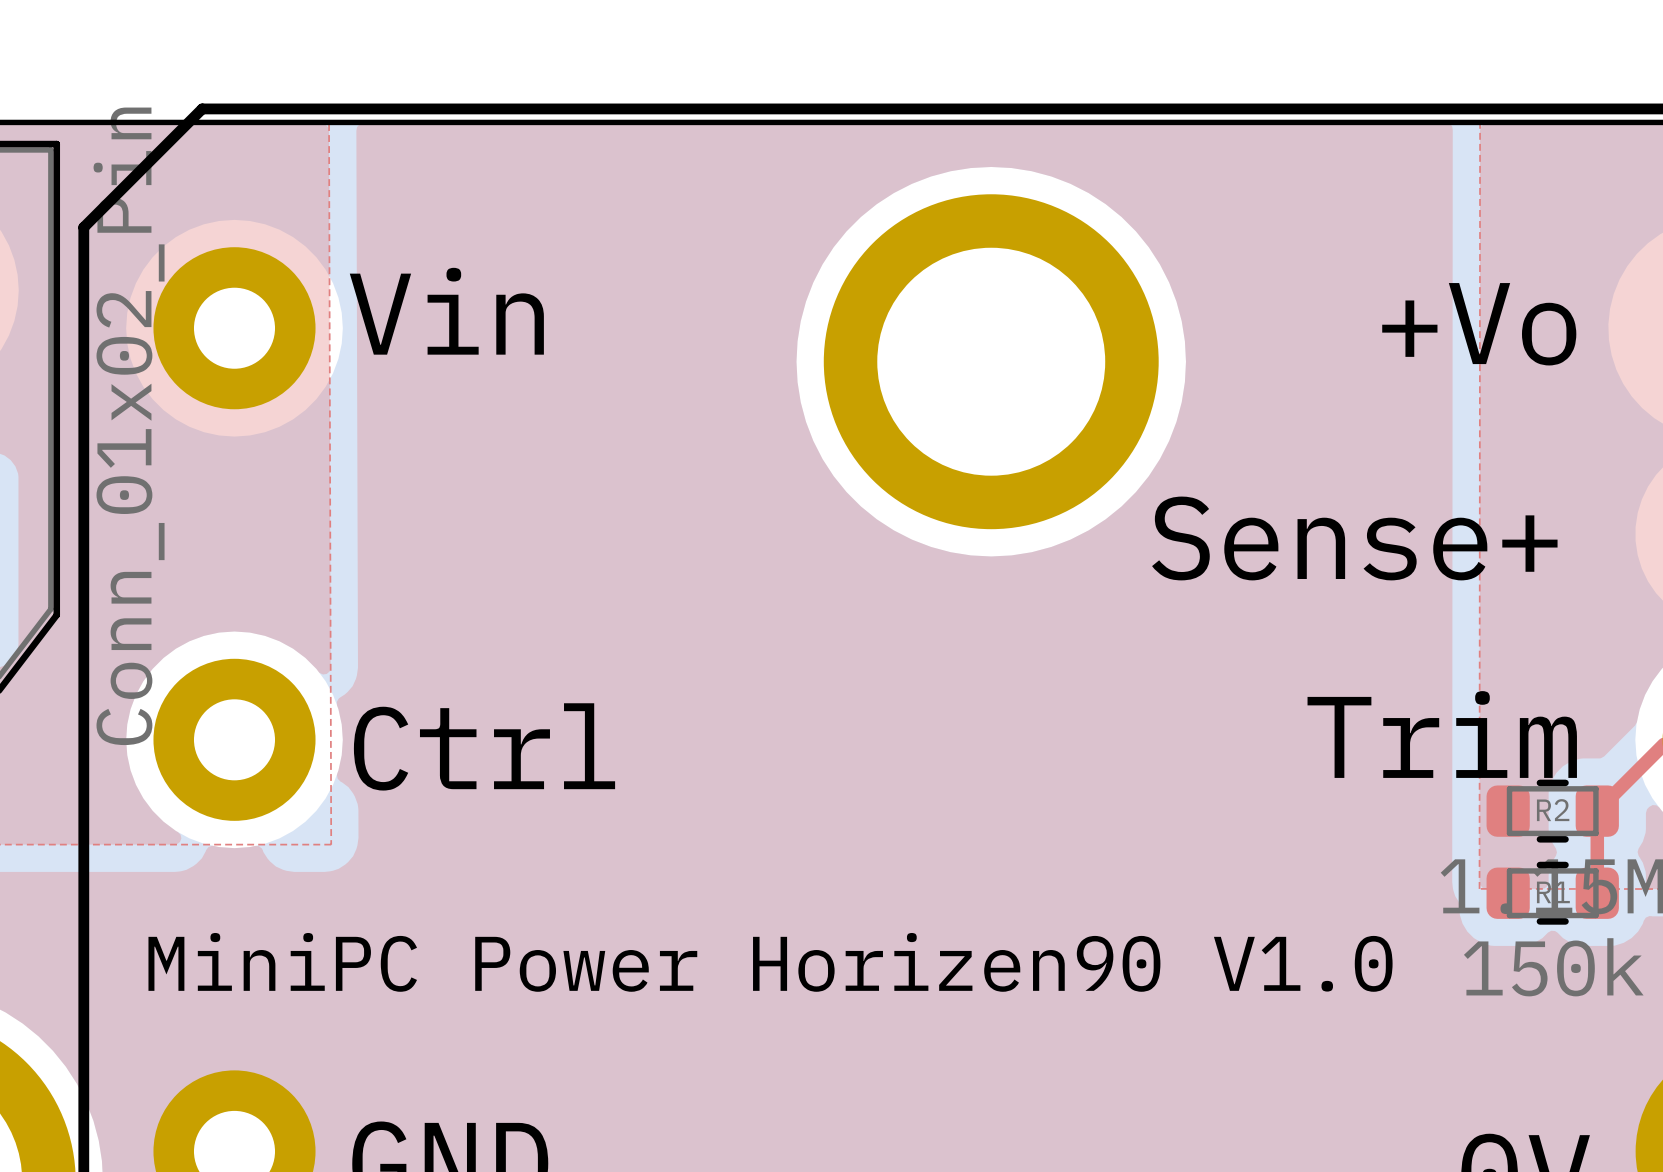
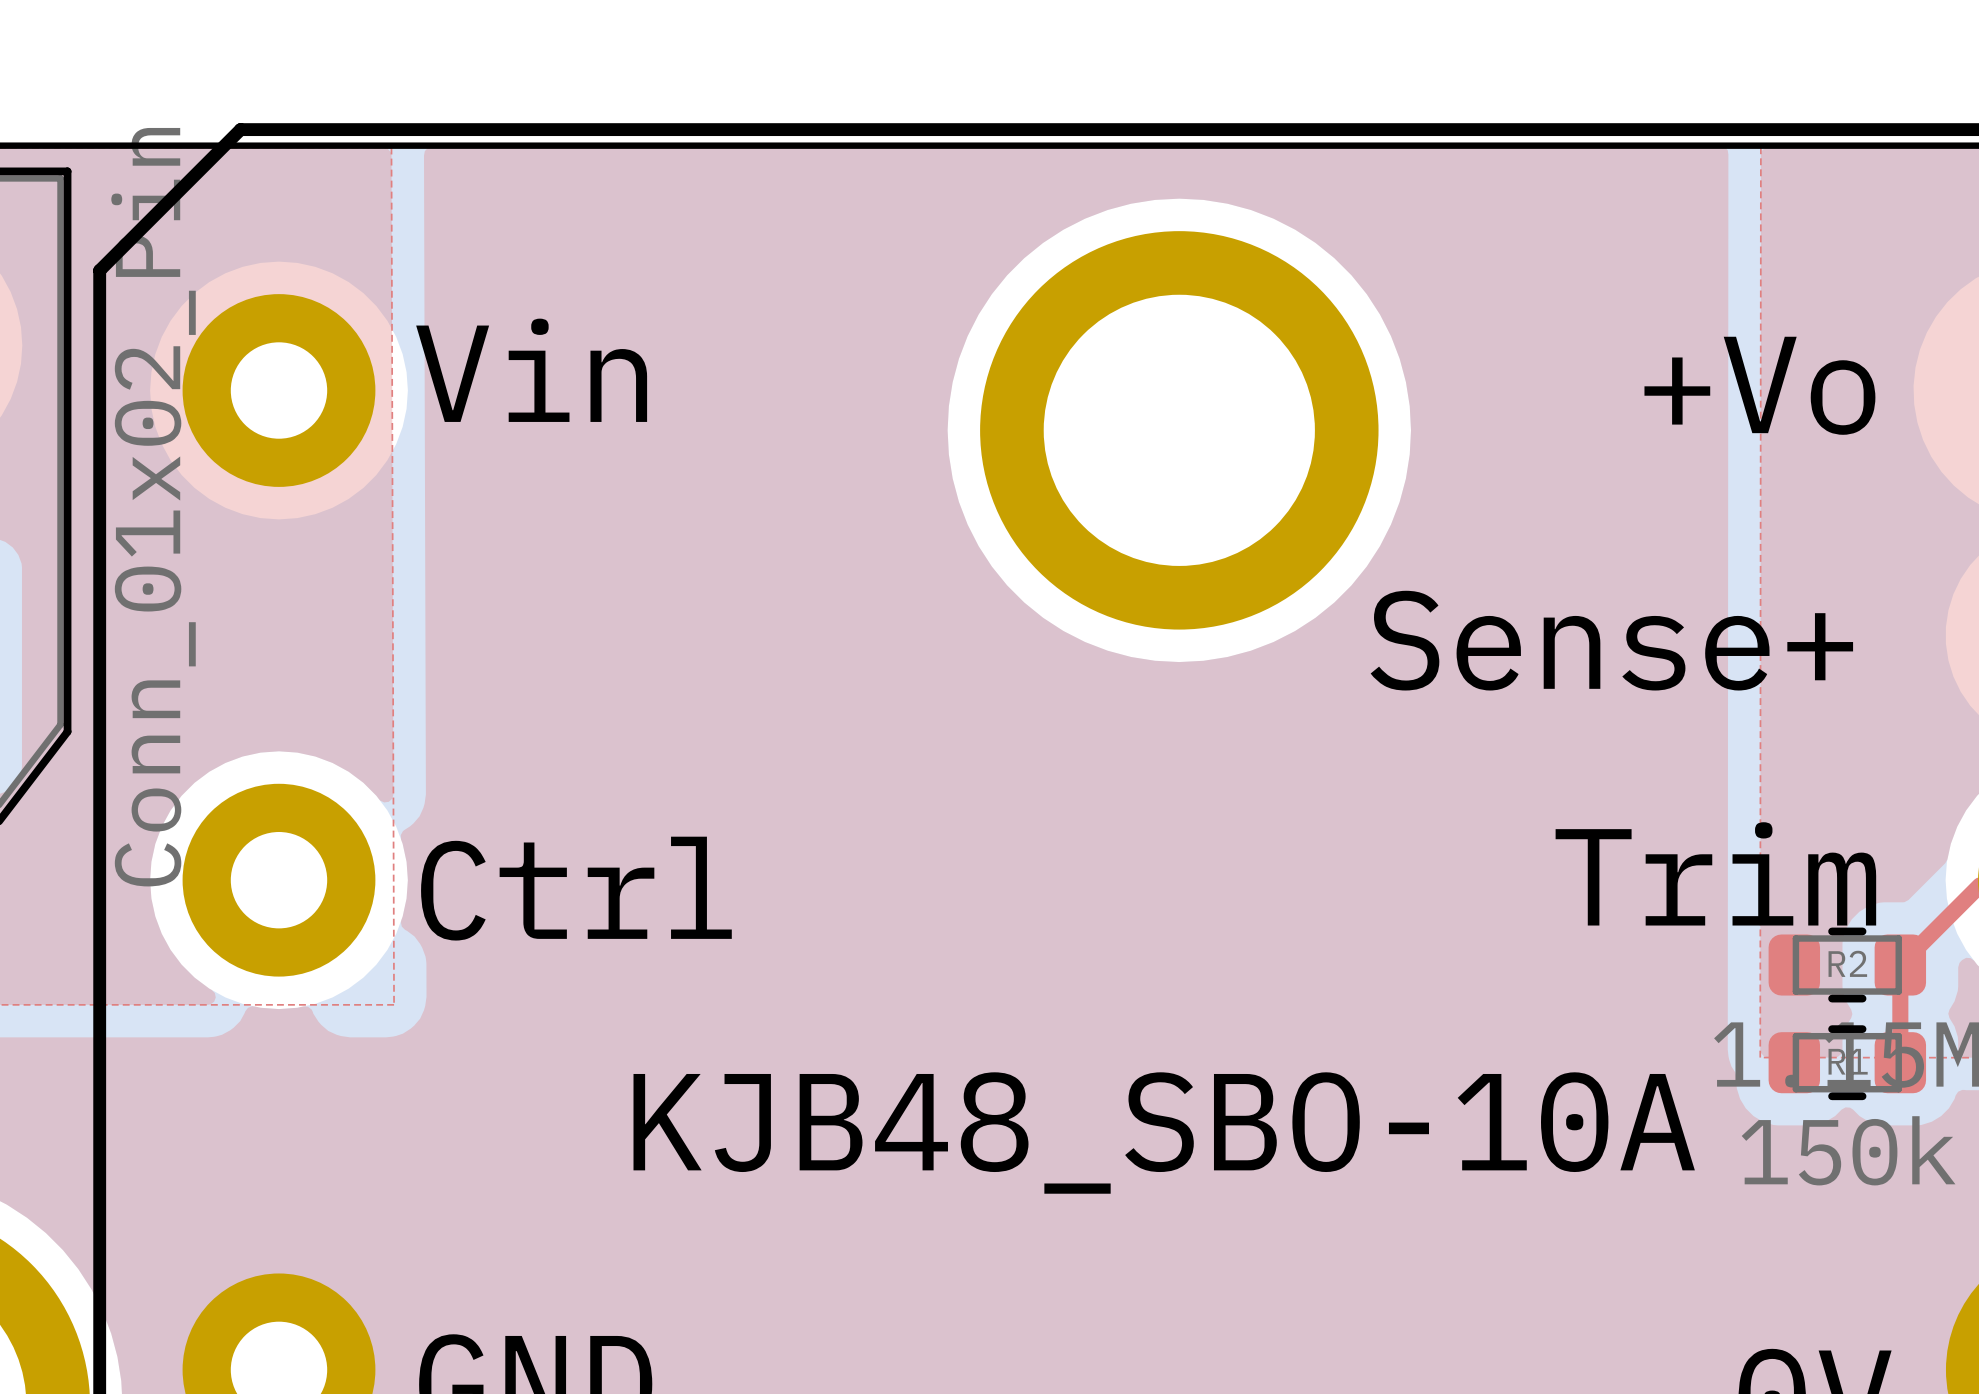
part text: none -> KJB48_SBO-10A (1164, 1133)
text: MiniPC Power Horizen90 V1.0 (770, 962) -> none

